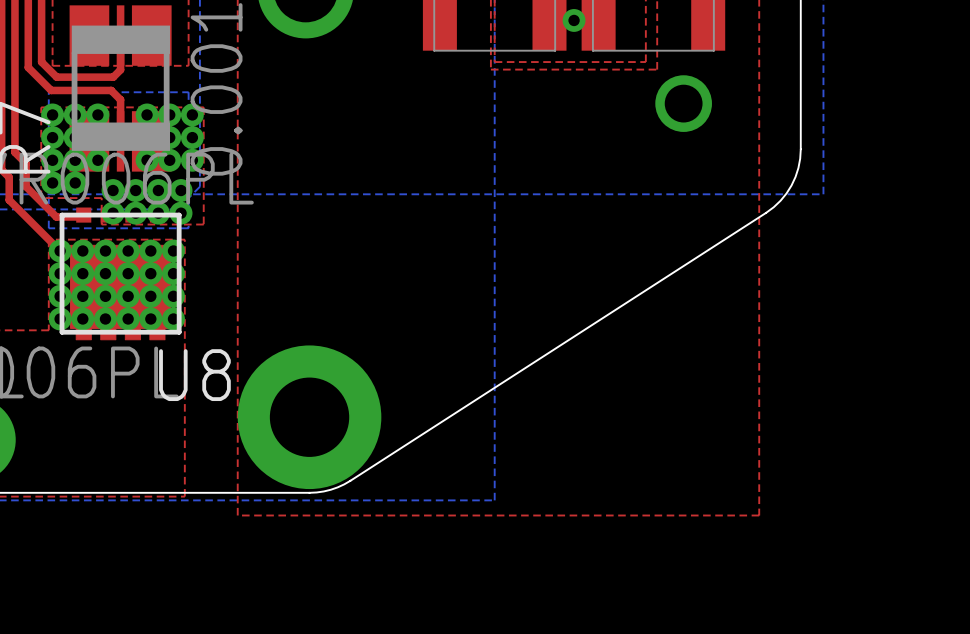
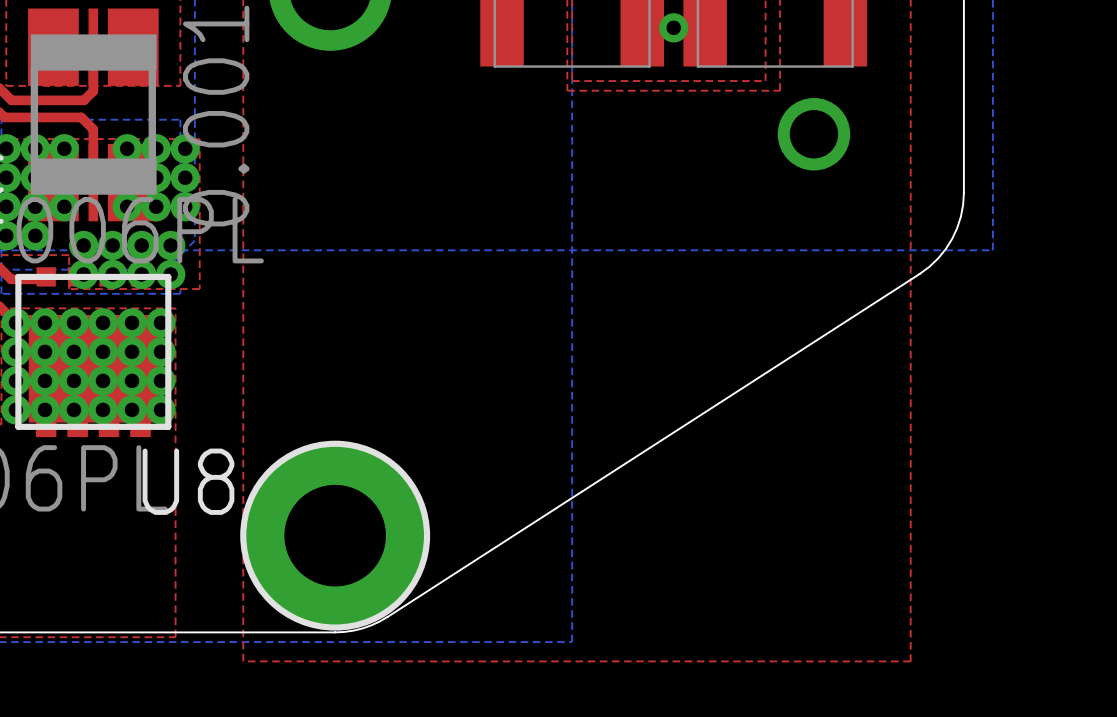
part footprint: [237, 345, 382, 490] -> [240, 440, 431, 631]

